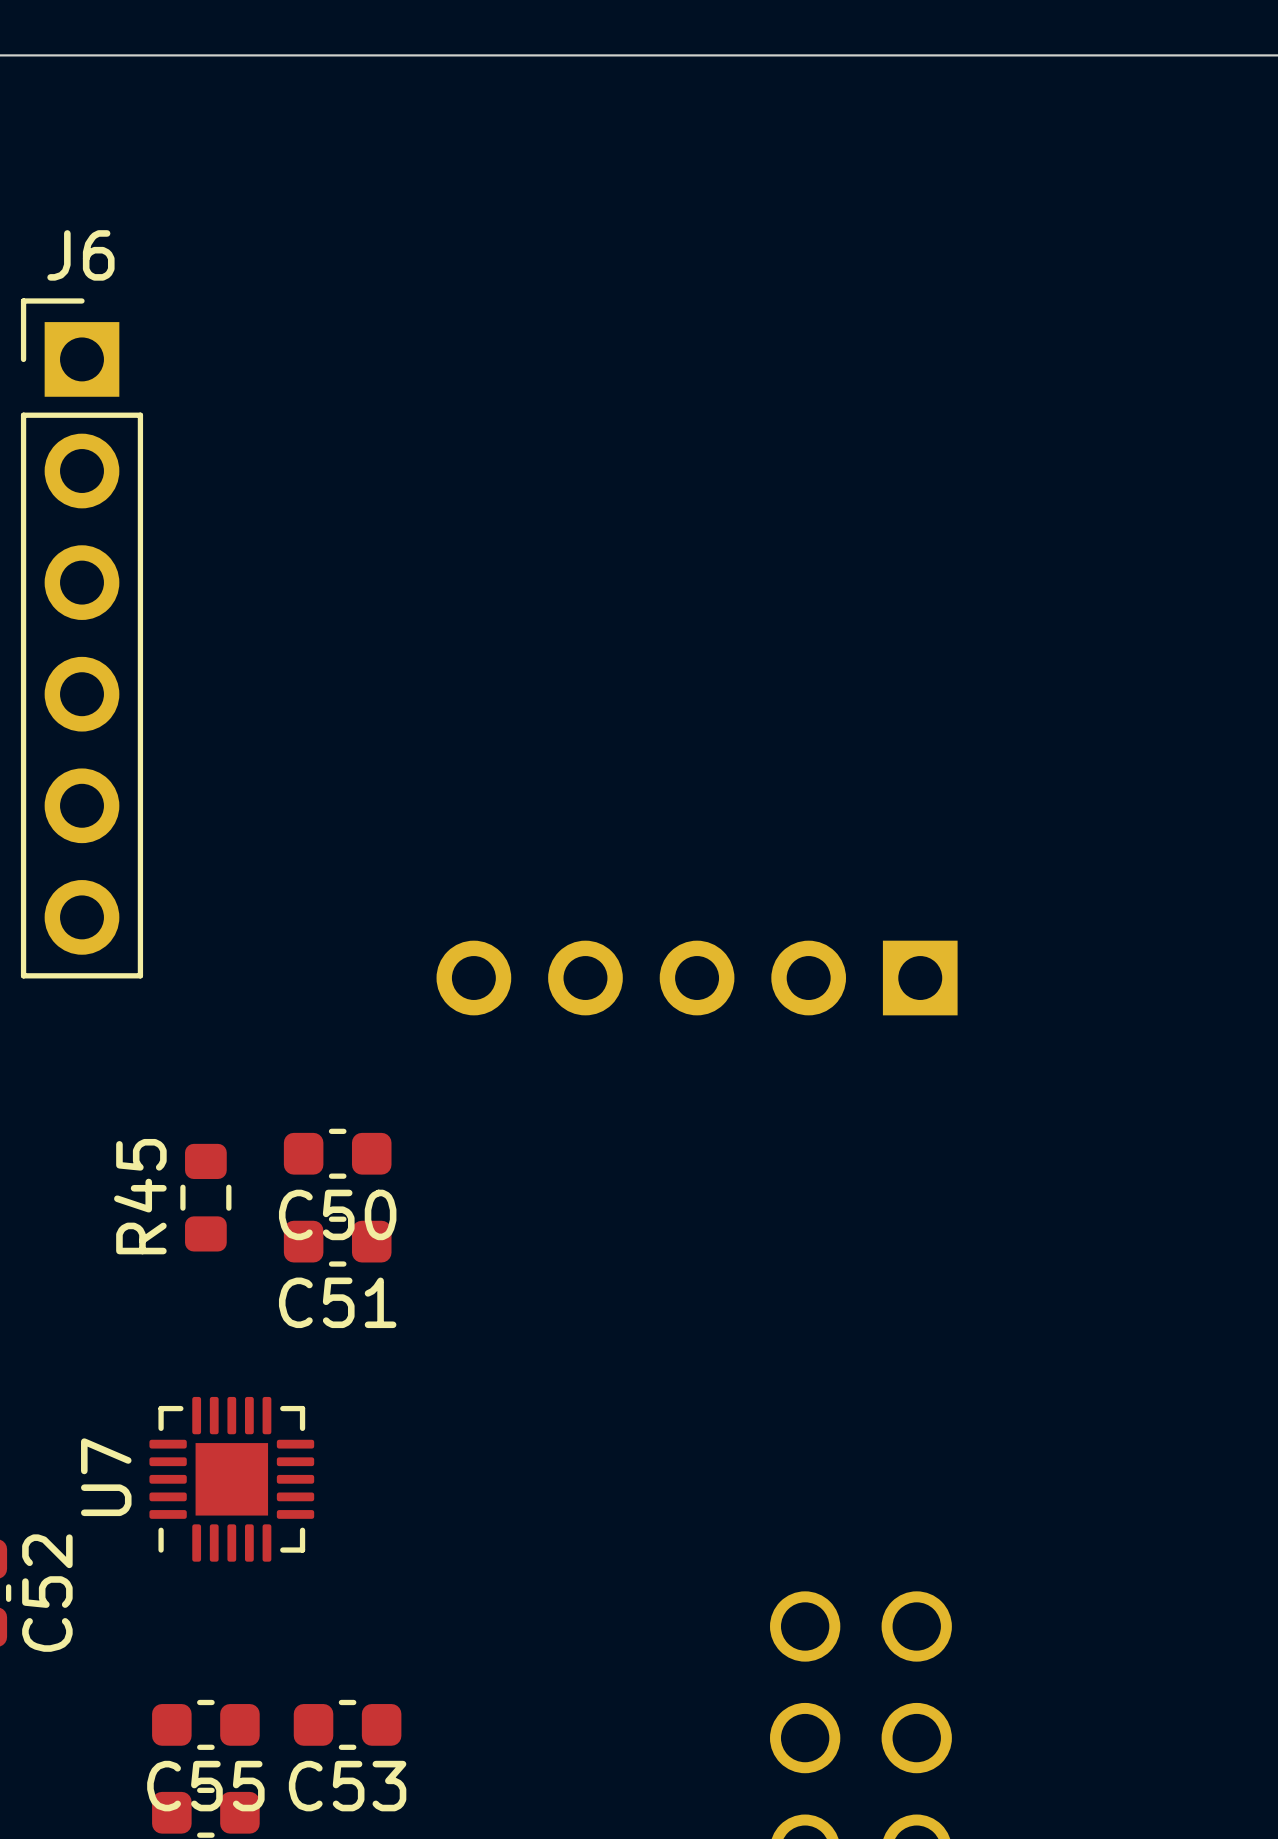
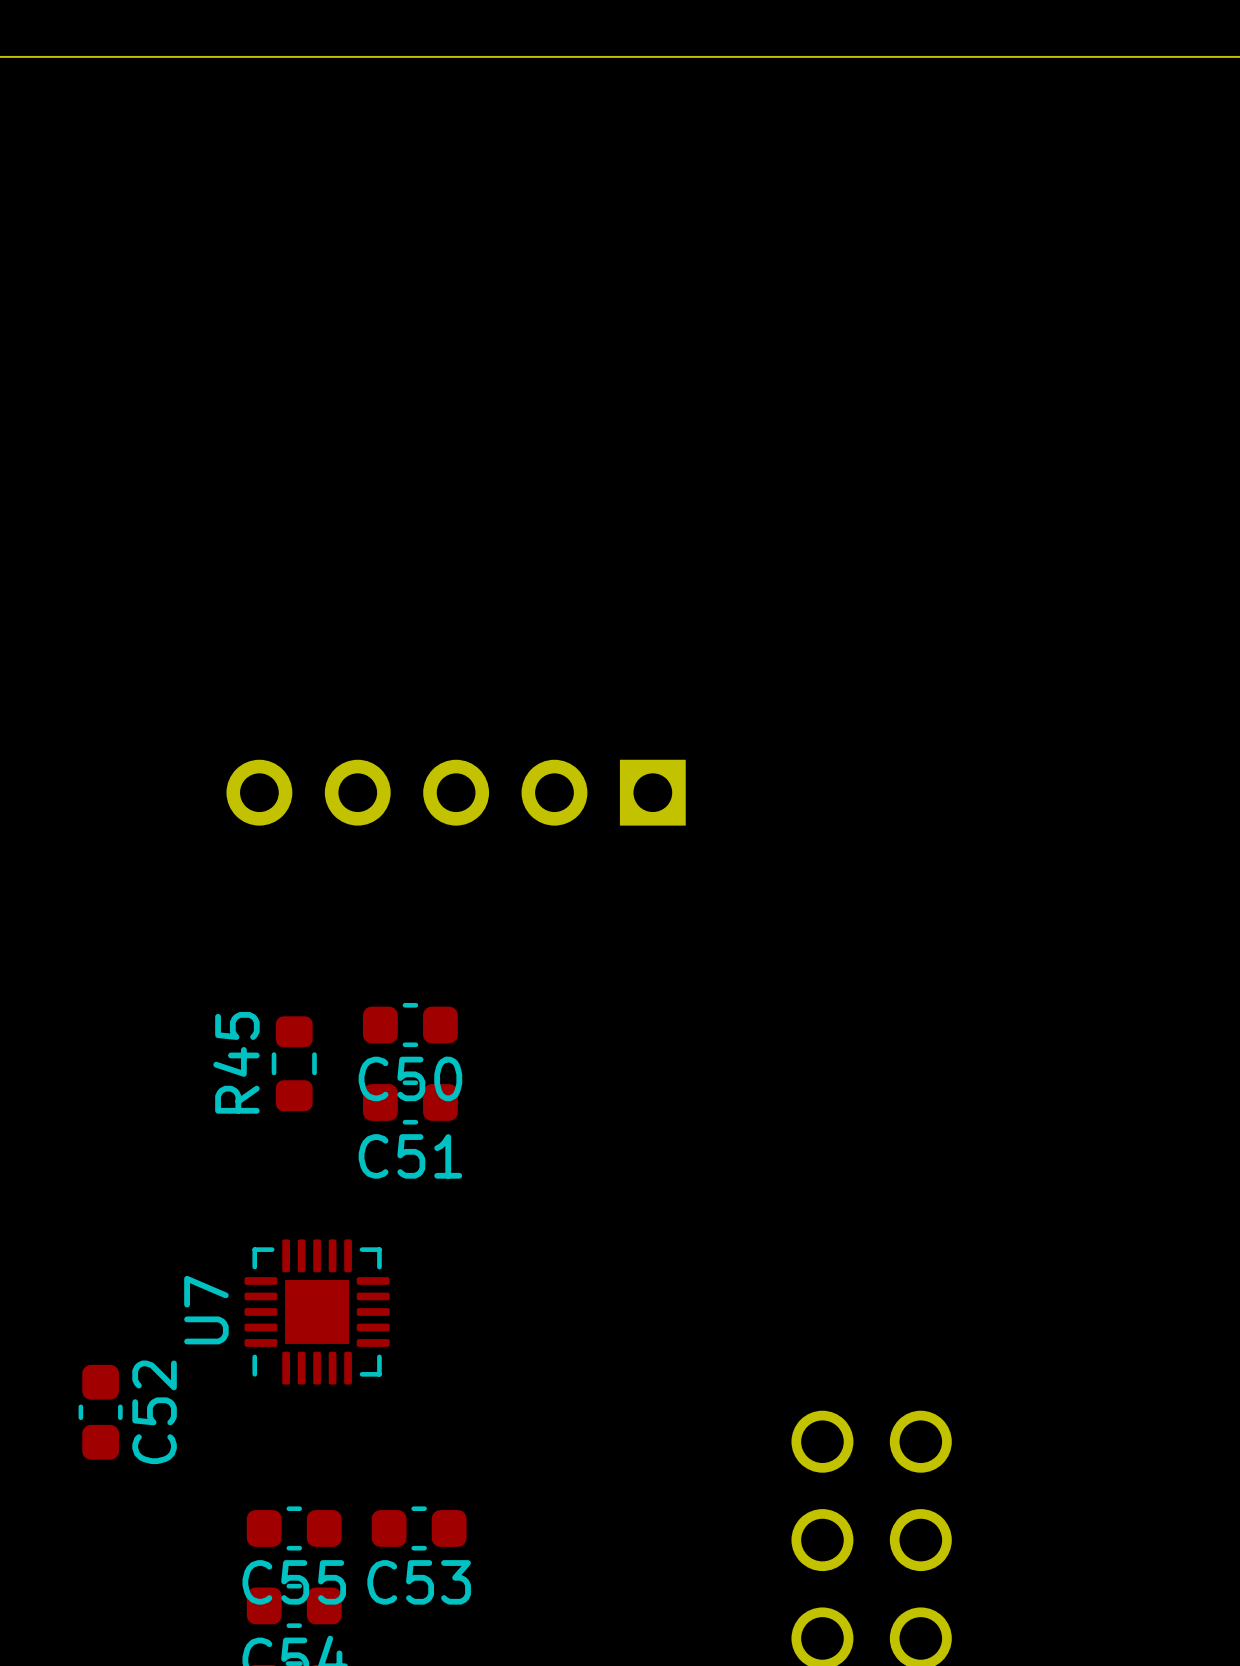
J6: (81, 638) -> none
part position: (697, 978) -> (456, 792)

